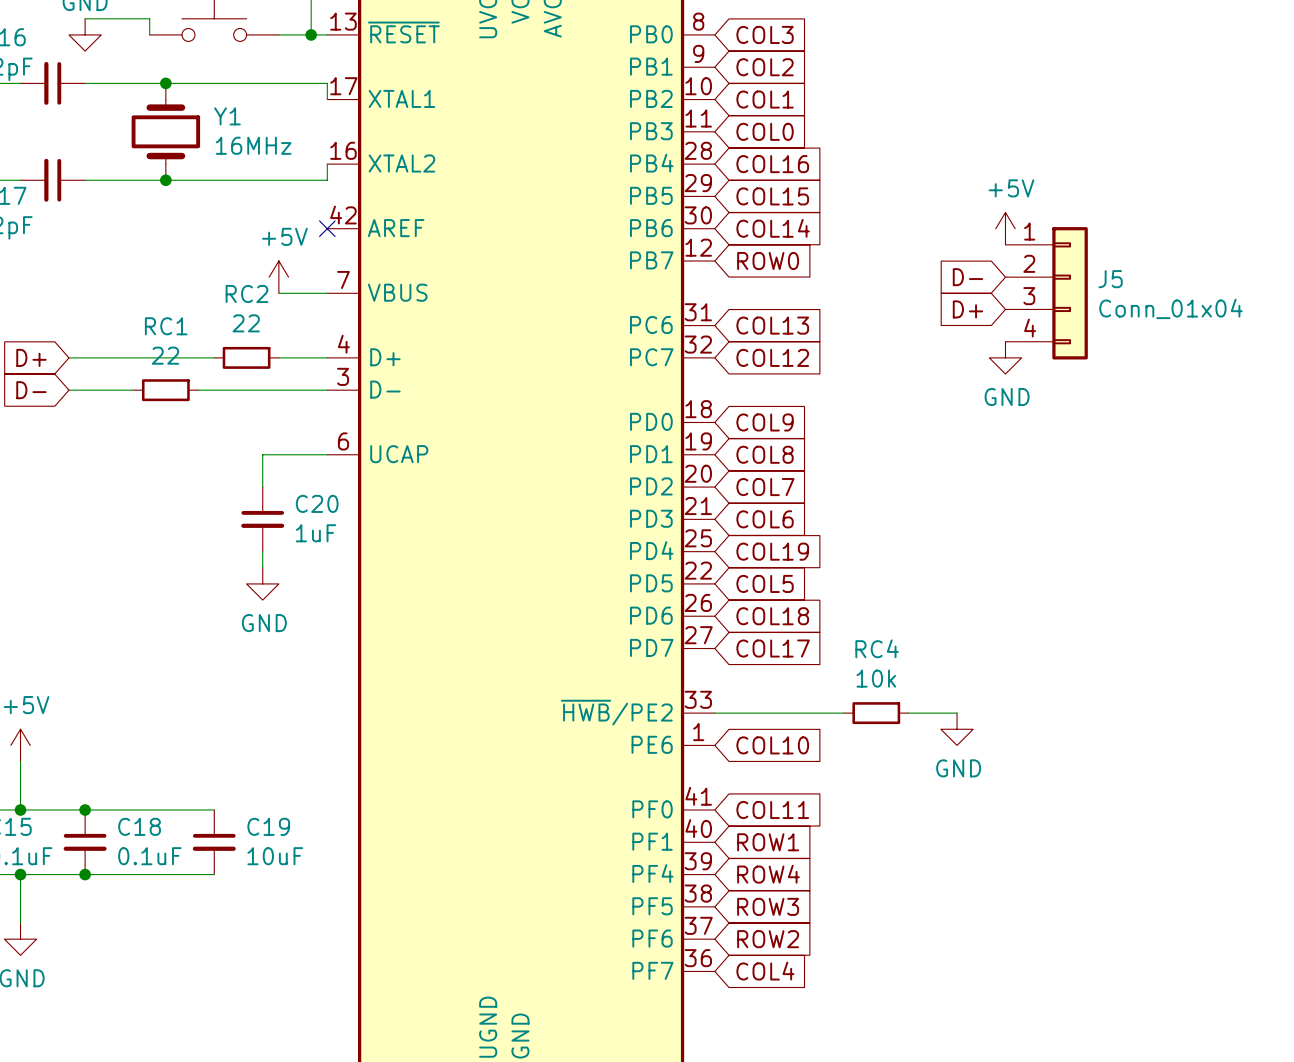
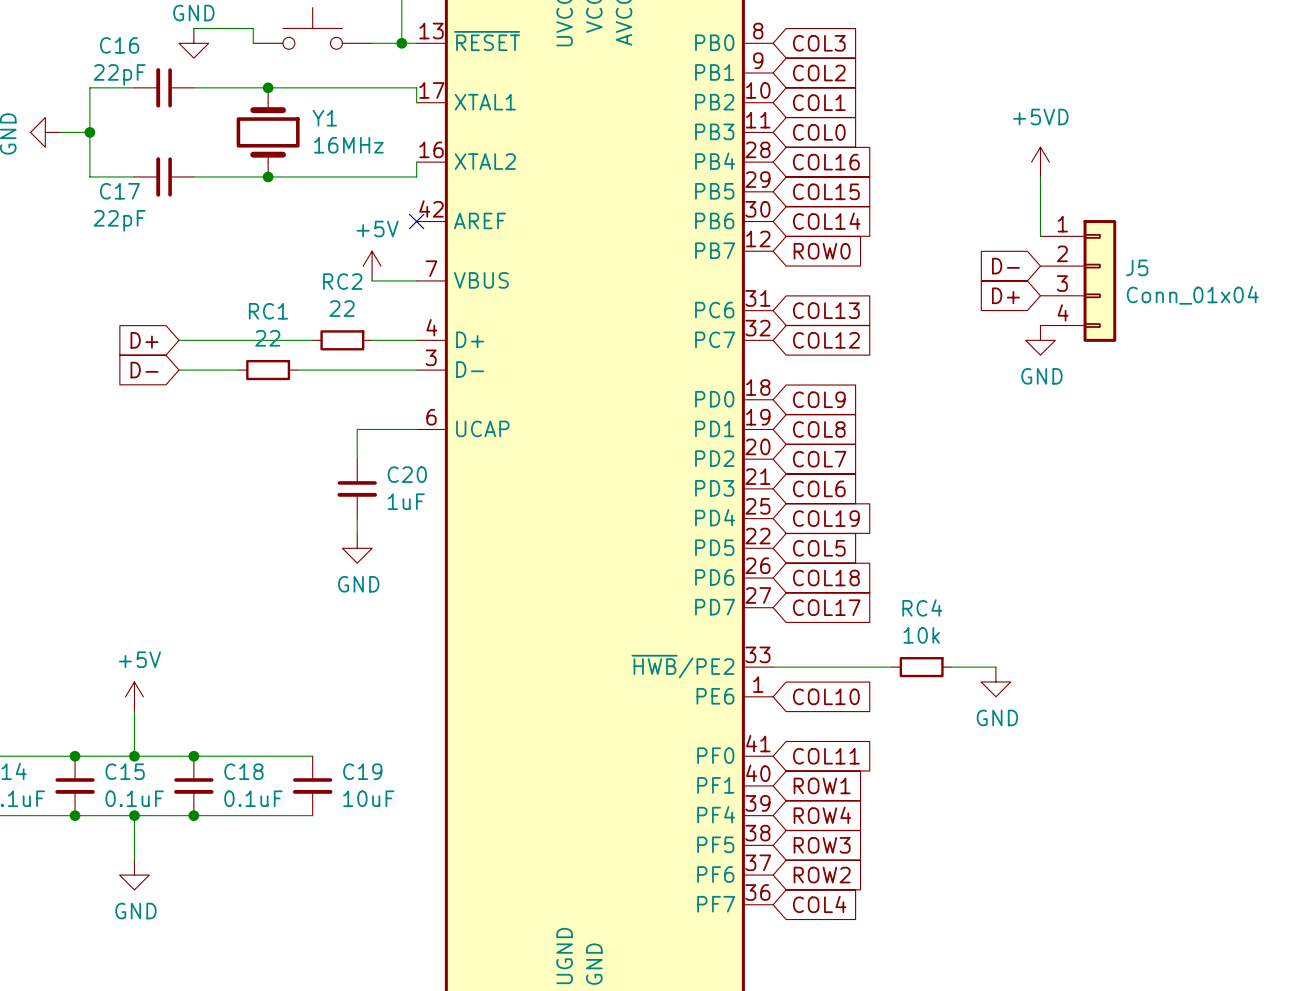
power symbol: none -> +5VD (1040, 162)
wire: none -> (1040, 176) (1040, 236)
power symbol: +5V (1005, 228) -> none

